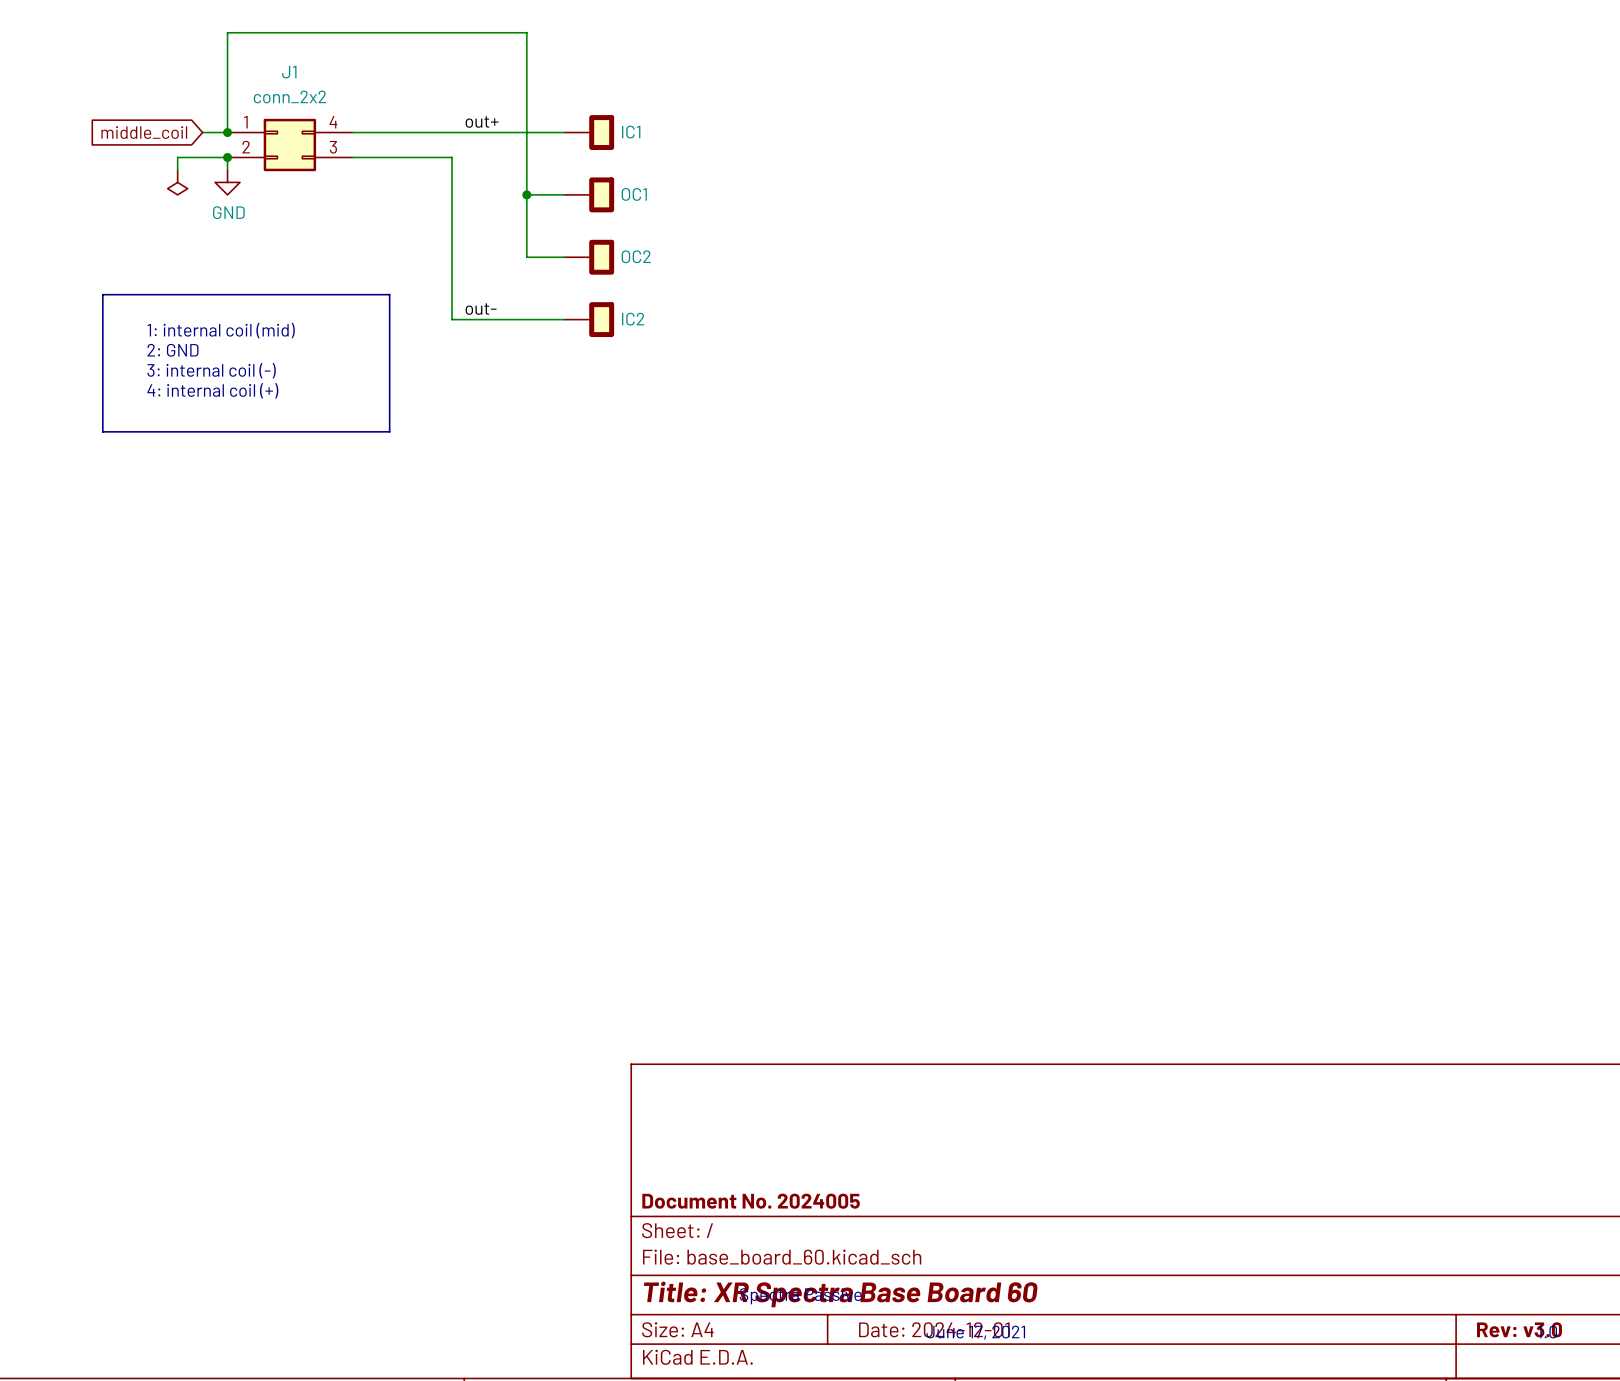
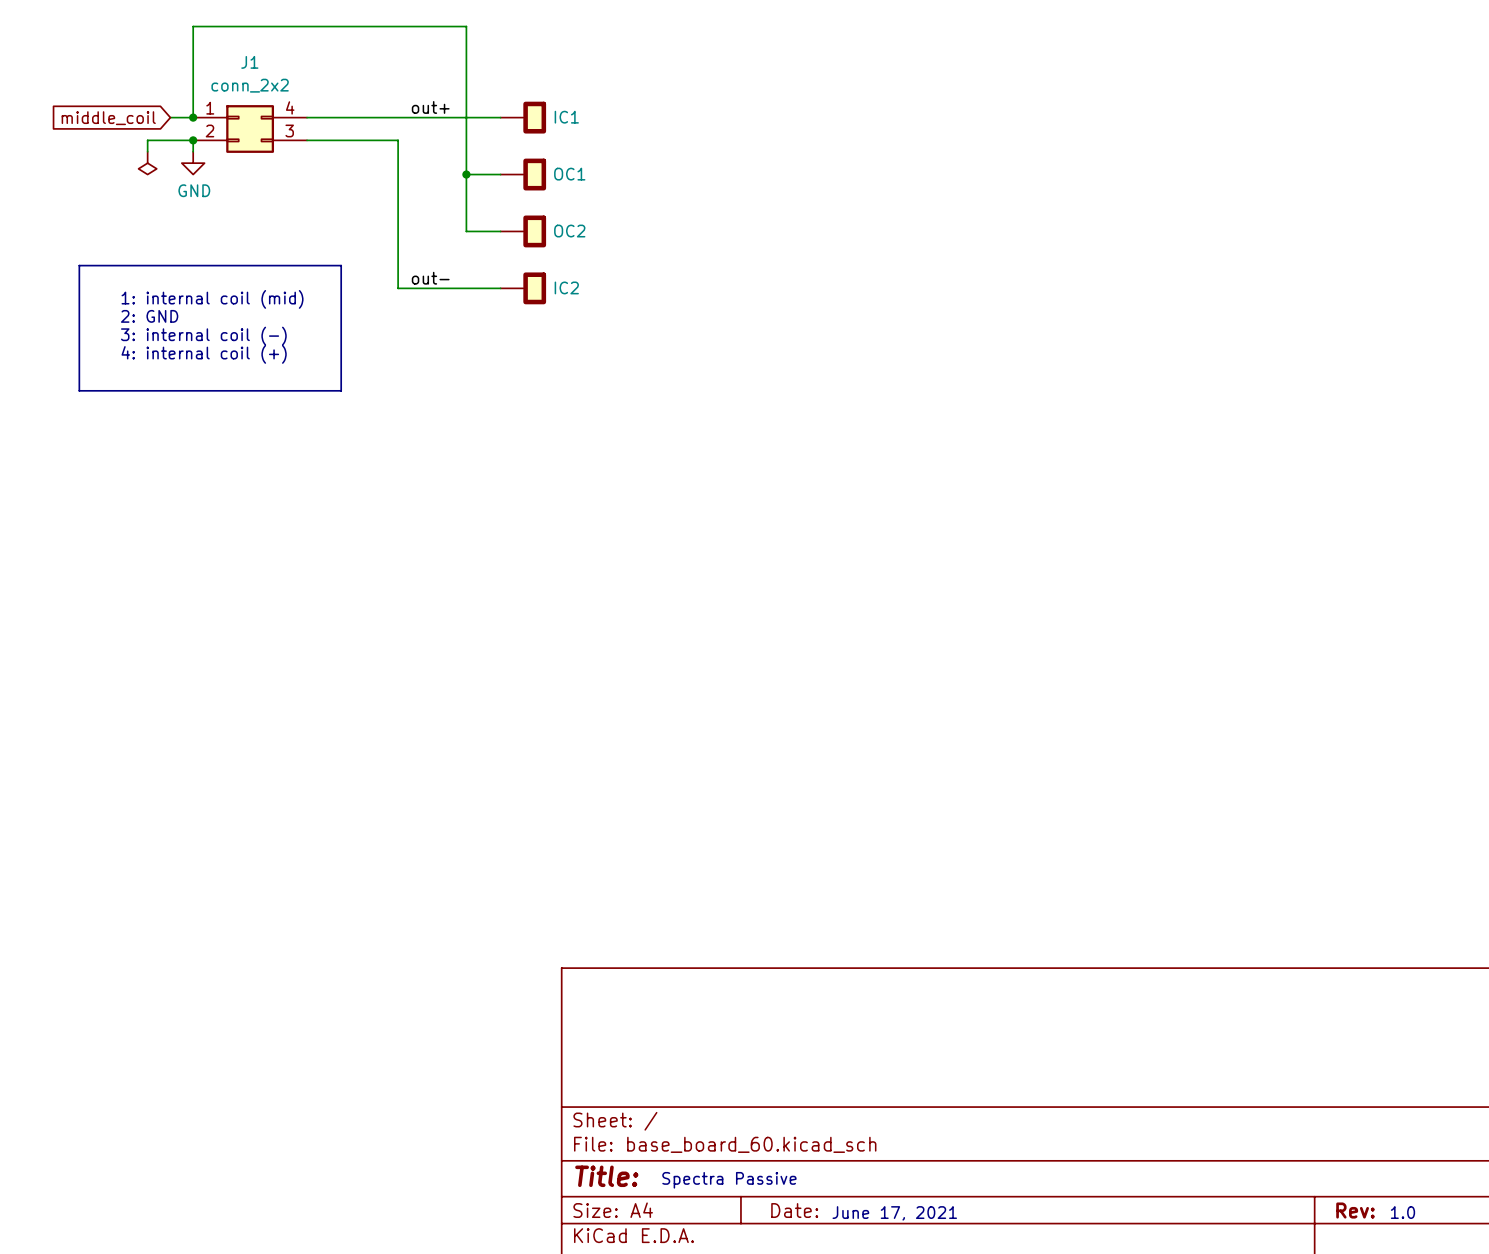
title block: Document No. 2024005 (751, 1201) -> none
title block: Title: XR Spectra Base Board 60 (840, 1294) -> Title: (606, 1176)
title block: Date: 2024-12-01 (934, 1329) -> Date: (794, 1210)
title block: Rev: v3.0 (1519, 1329) -> Rev: (1355, 1210)

